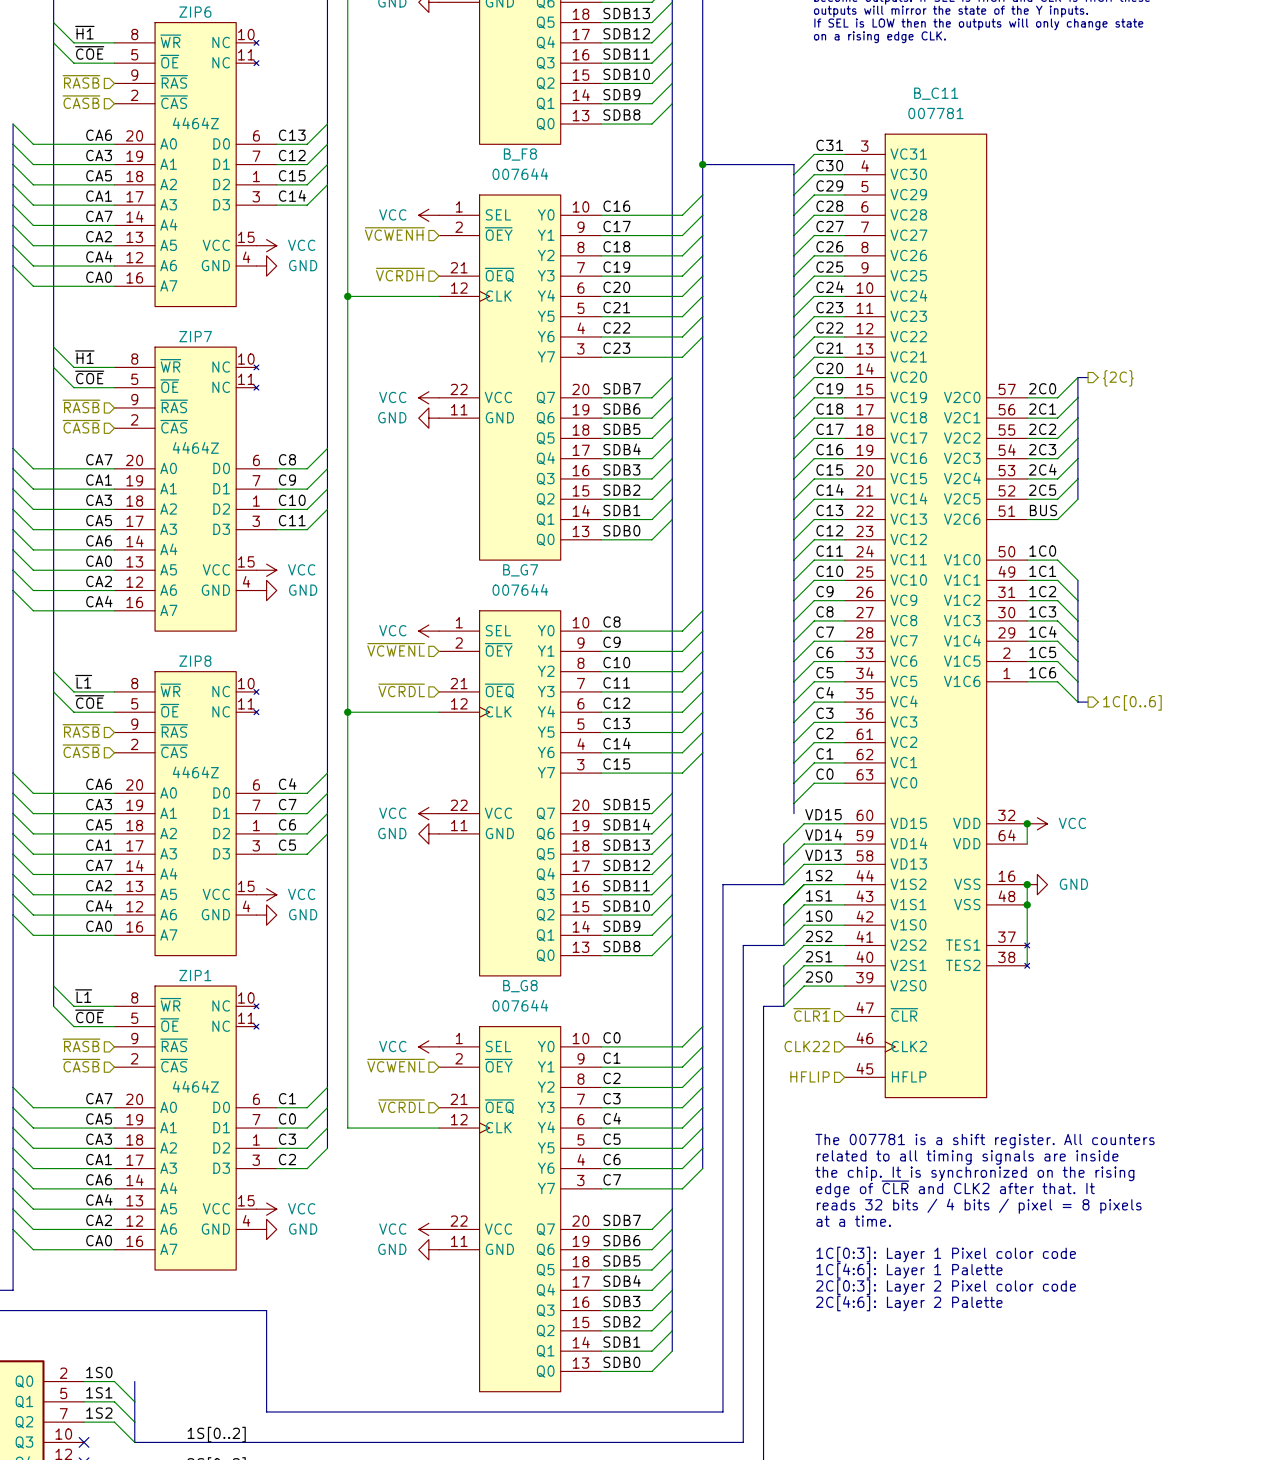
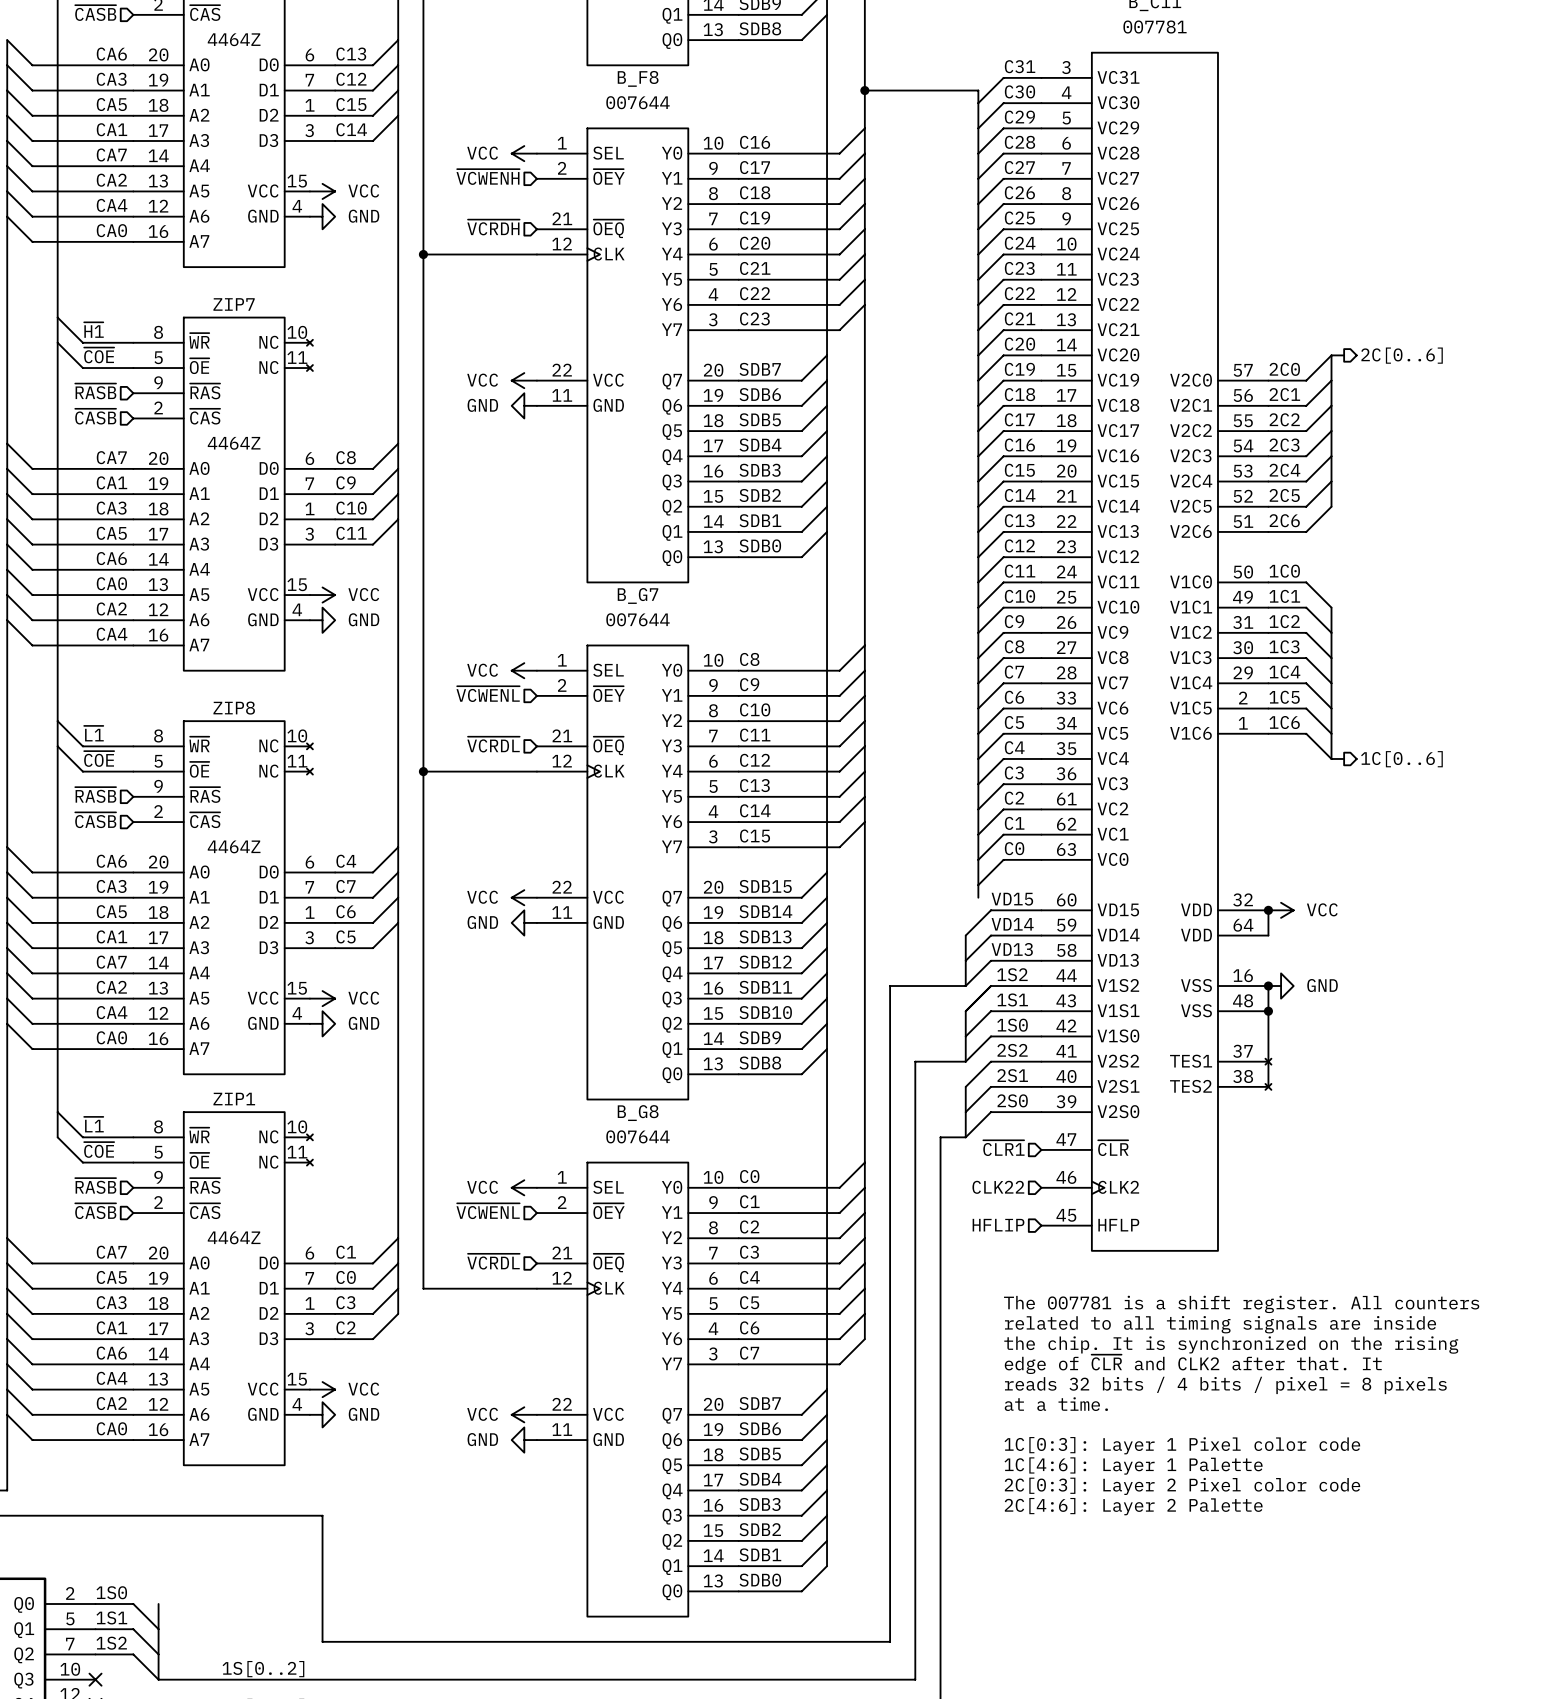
hierarchical label: {2C} (1118, 378) -> 2C[0..6] (1402, 355)
label: BUS (1043, 510) -> 2C6 (1284, 520)

